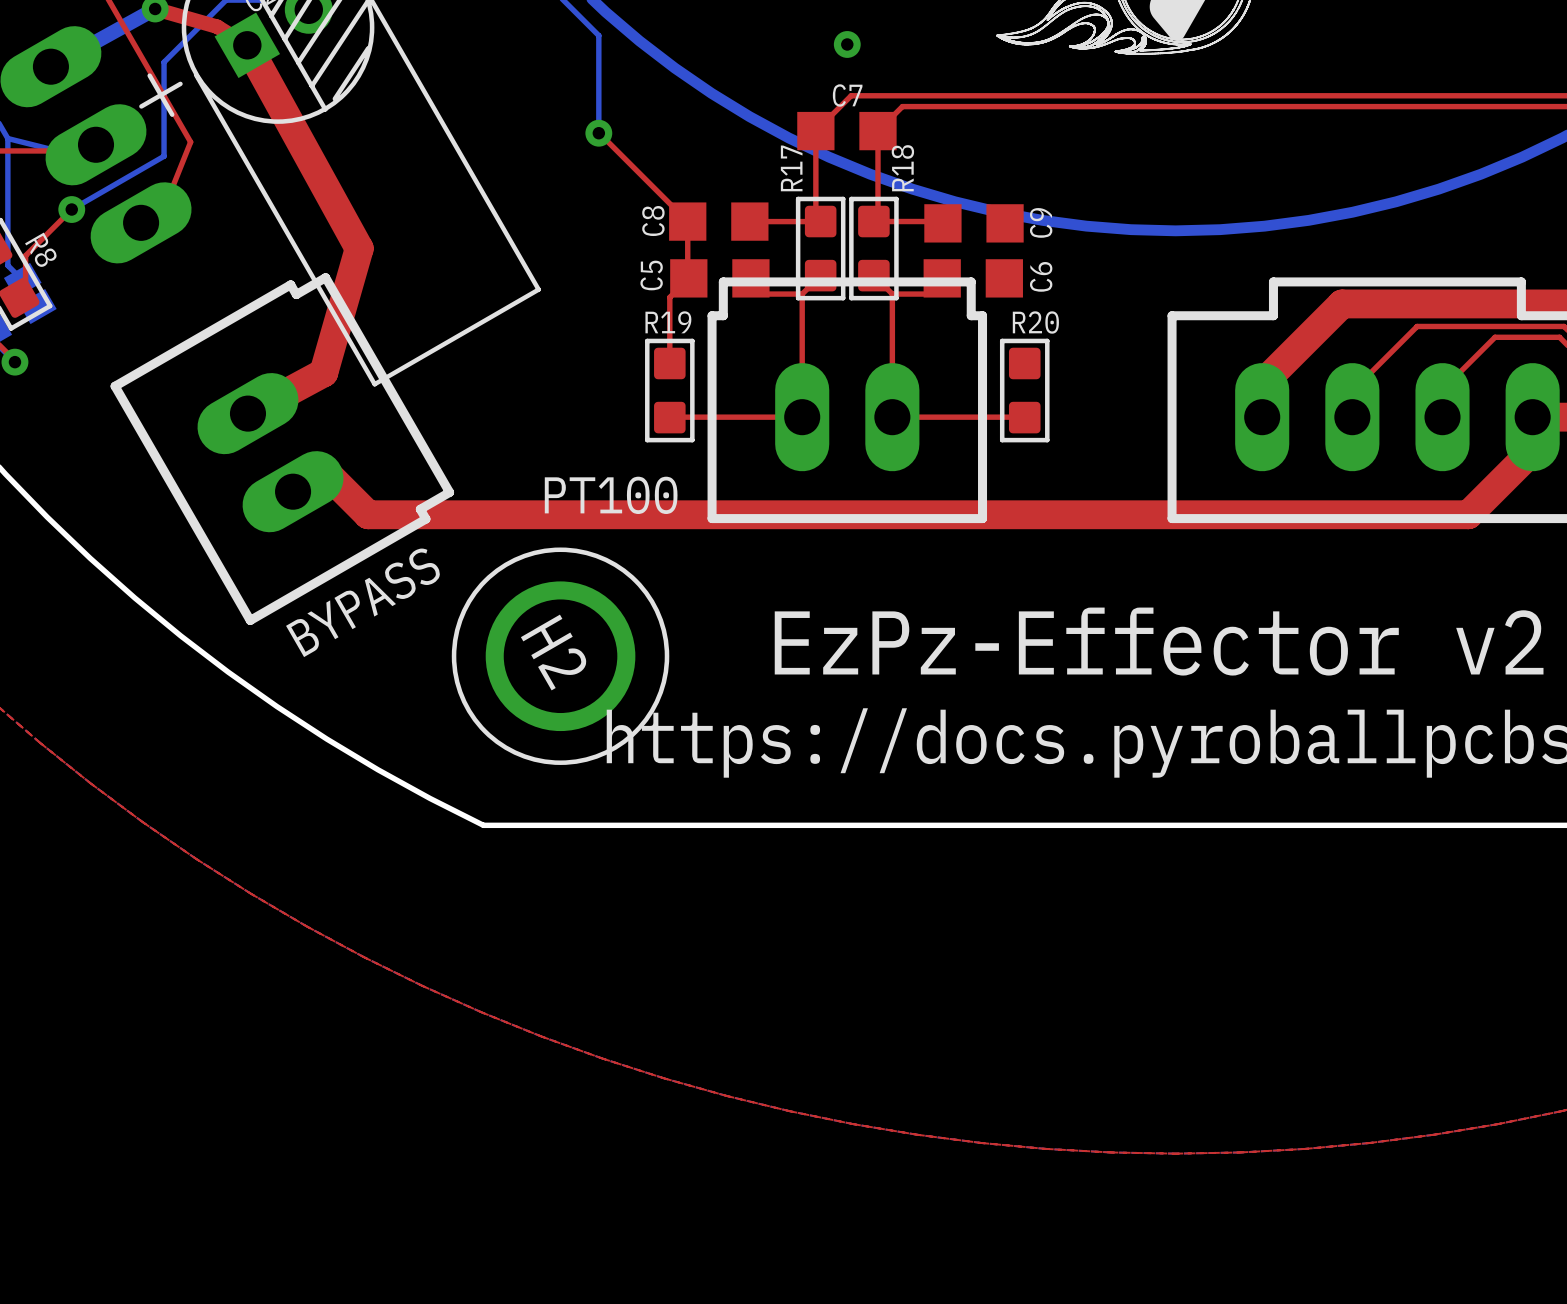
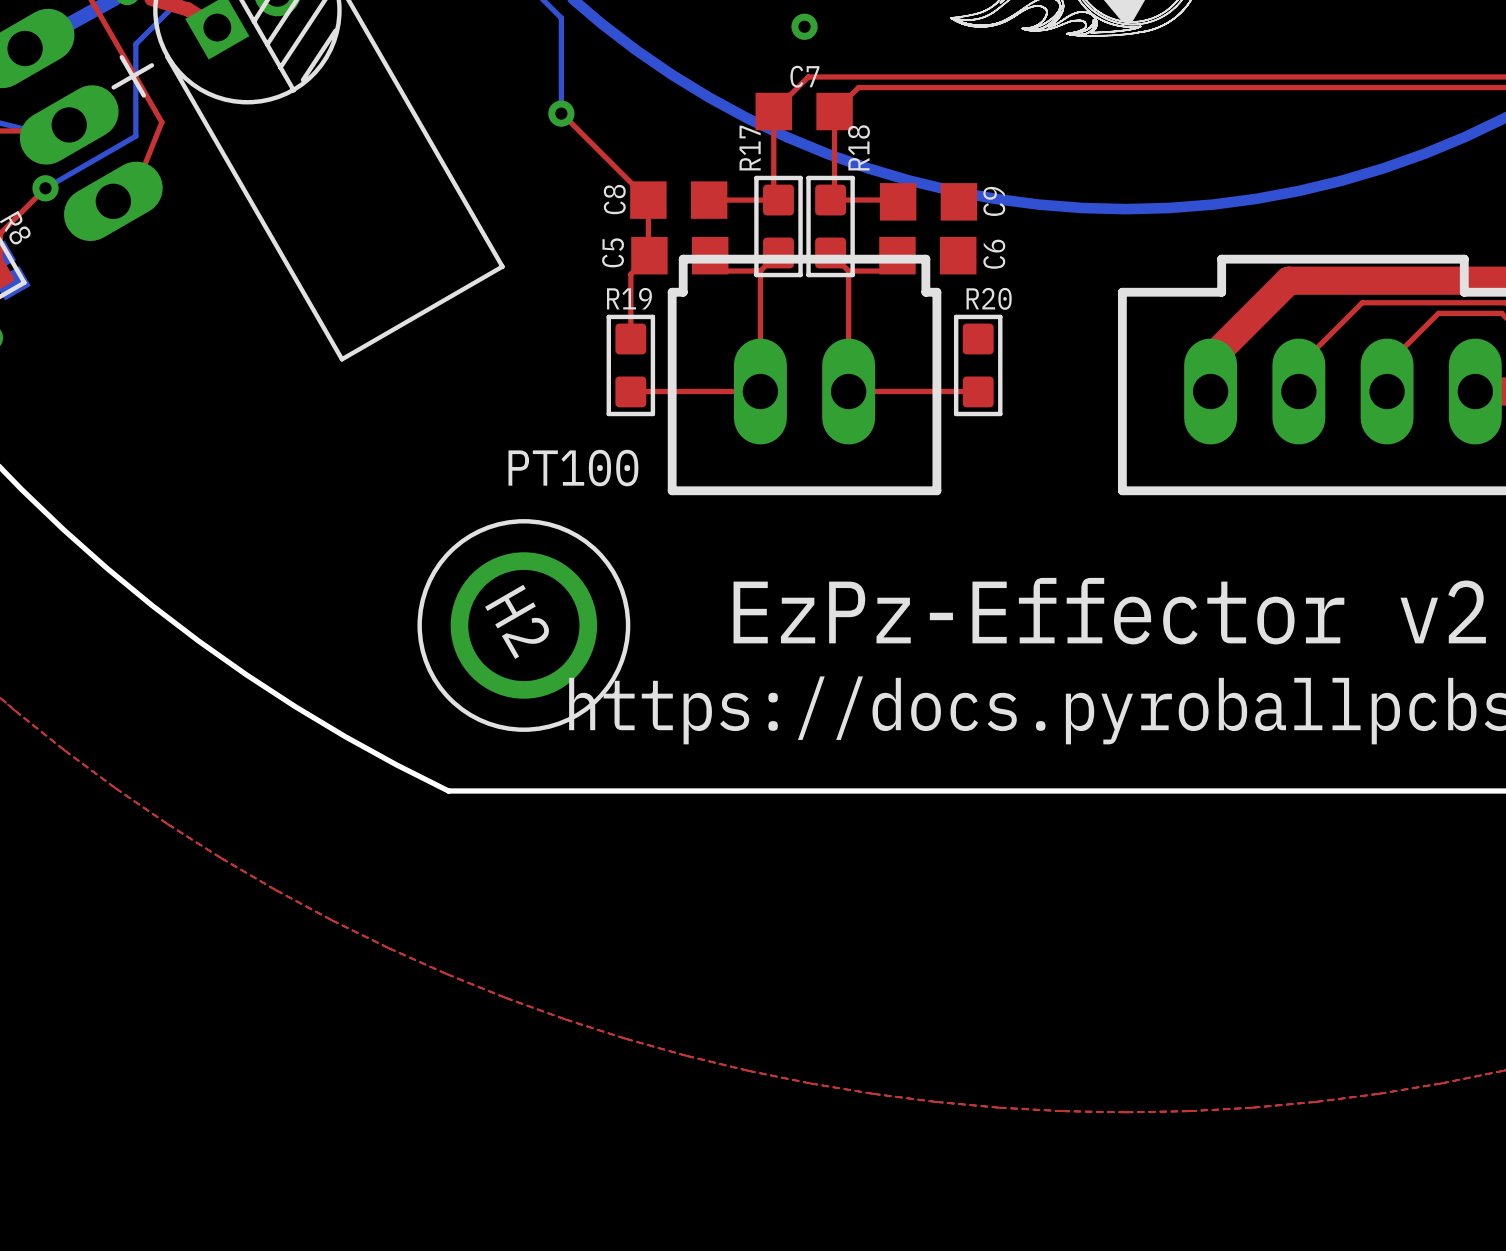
top track: (247, 45) (359, 248) (323, 372) (247, 413) -> none
top track: (1532, 417) (1532, 450) (1468, 514) (368, 514) (327, 473) (293, 491) -> none
BYPASS: (282, 449) -> none

